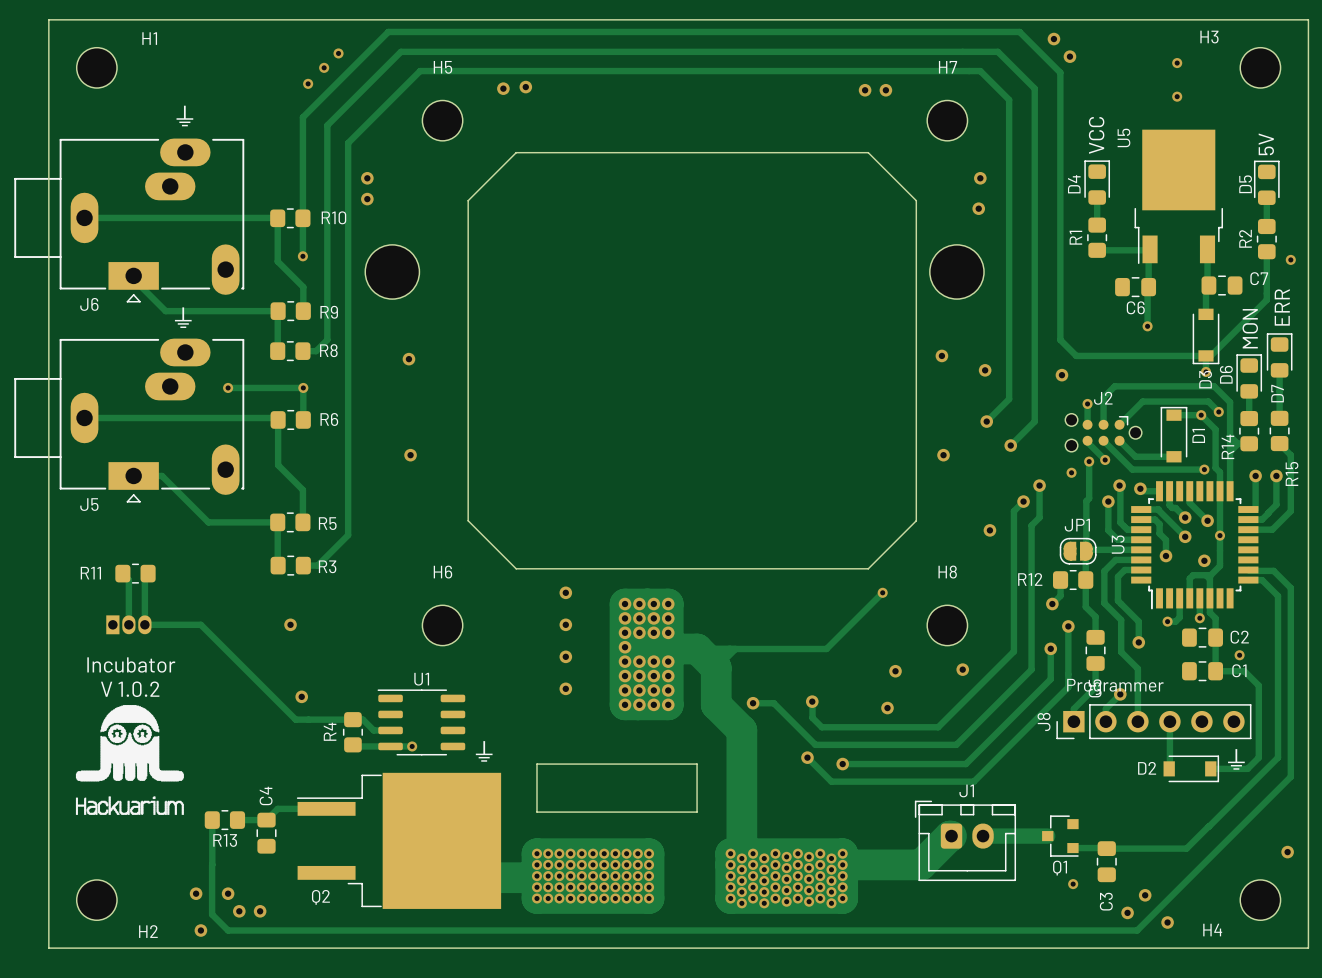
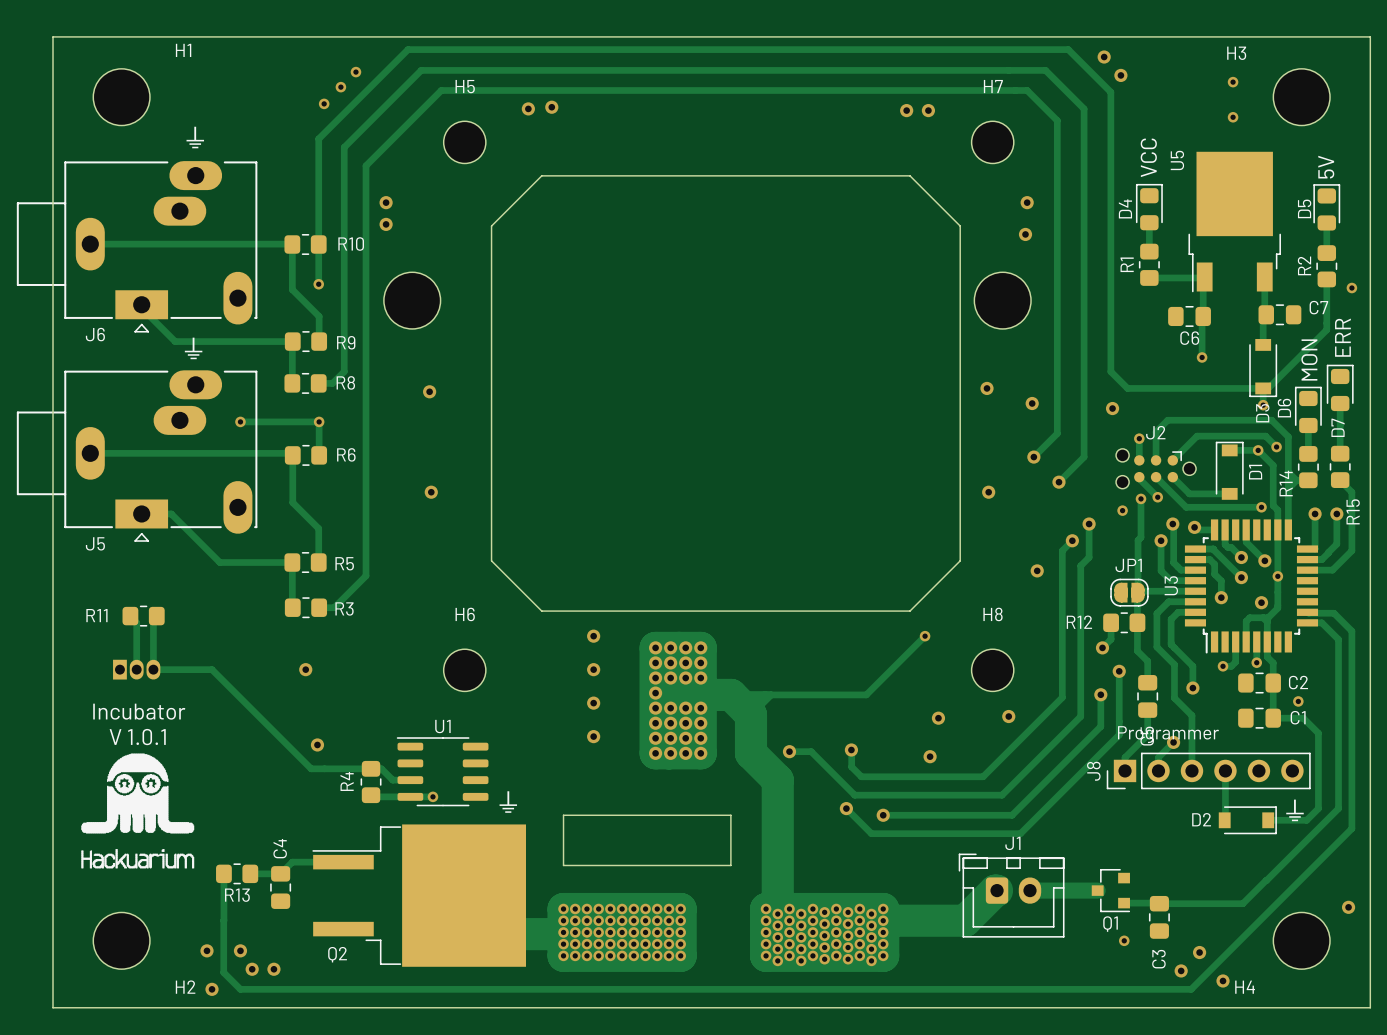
H1 footprint: [76, 47, 118, 89] -> [93, 68, 150, 126]
H3 footprint: [1240, 47, 1281, 89] -> [1273, 68, 1331, 126]
text: V 1.0.2 (130, 689) -> V 1.0.1 (137, 737)
H2 footprint: [76, 879, 118, 921] -> [93, 912, 150, 970]
H4 footprint: [1240, 879, 1281, 921] -> [1273, 912, 1331, 970]

